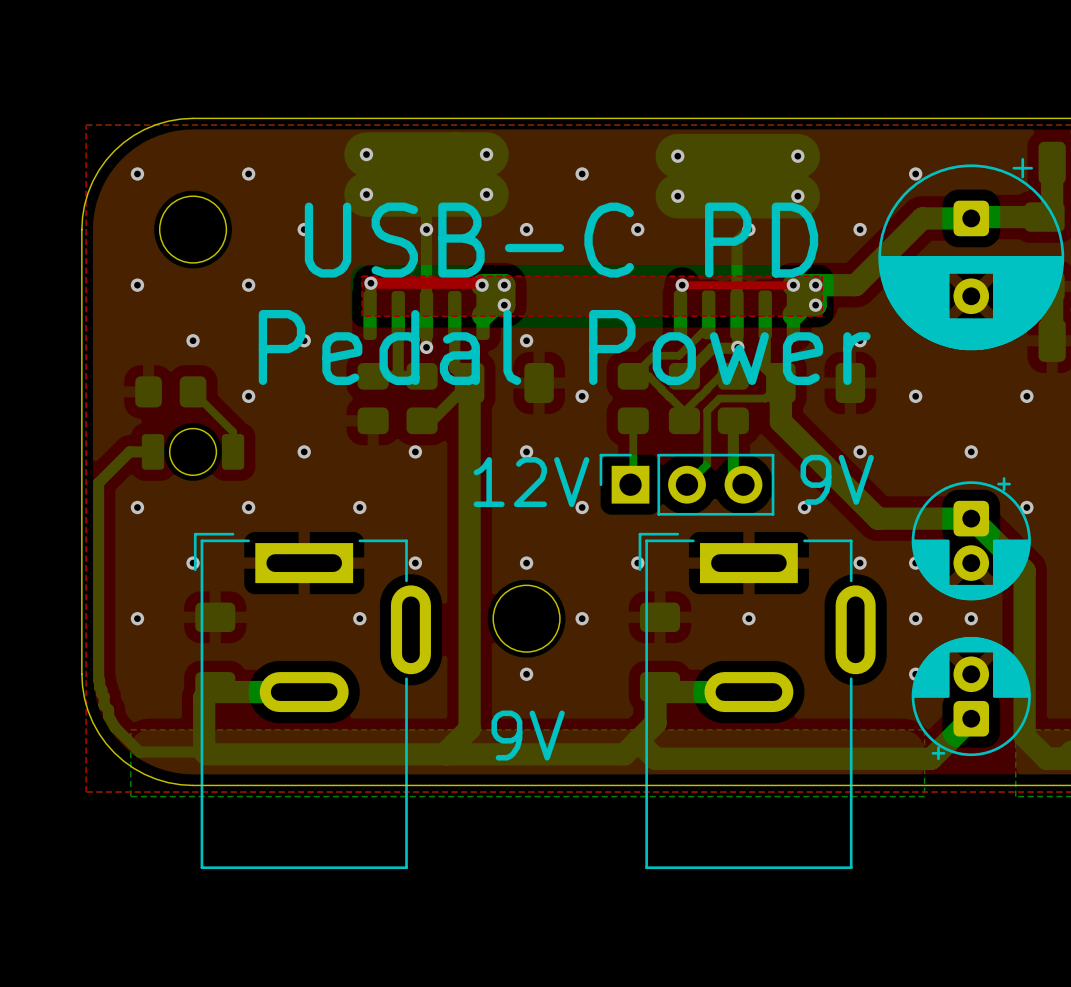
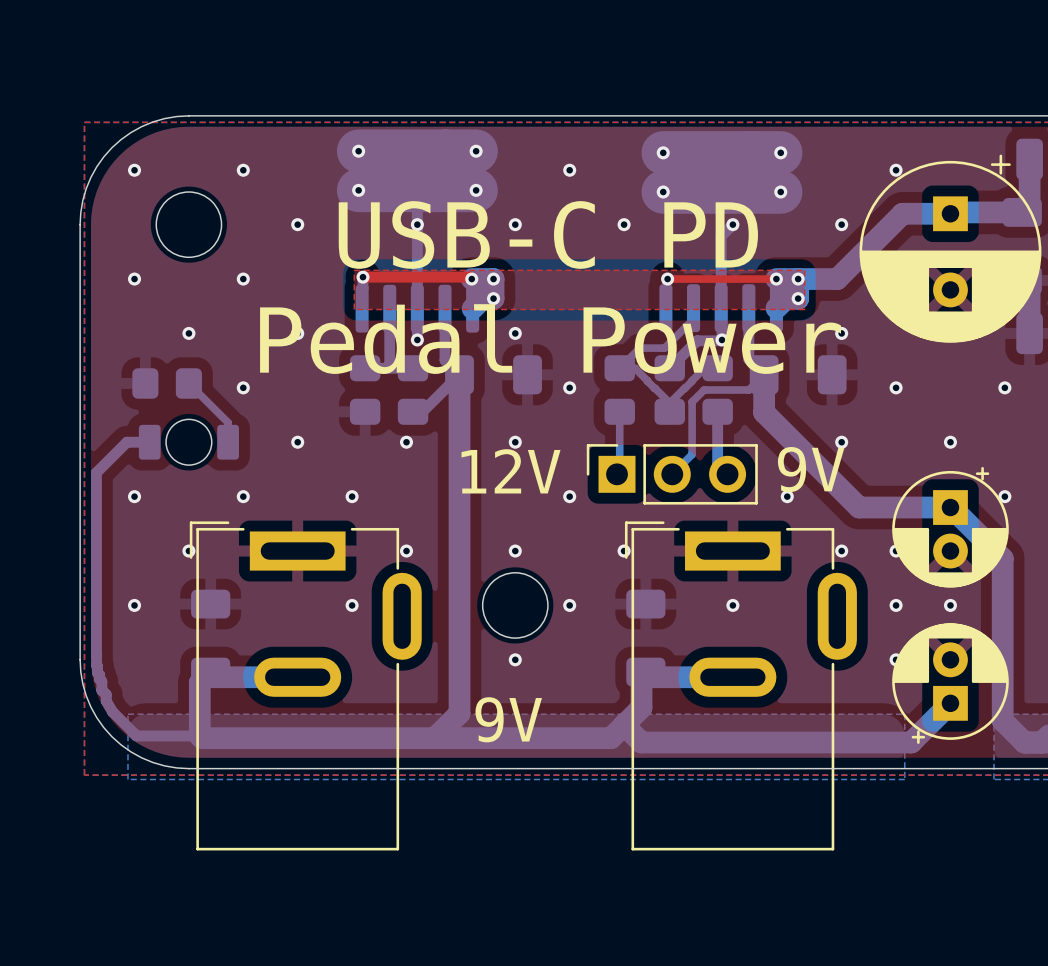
part footprint: [878, 157, 1065, 351] -> [859, 154, 1042, 343]
part footprint: [911, 477, 1031, 601] -> [892, 466, 1009, 588]
part footprint: [911, 636, 1031, 761] -> [892, 623, 1009, 744]

